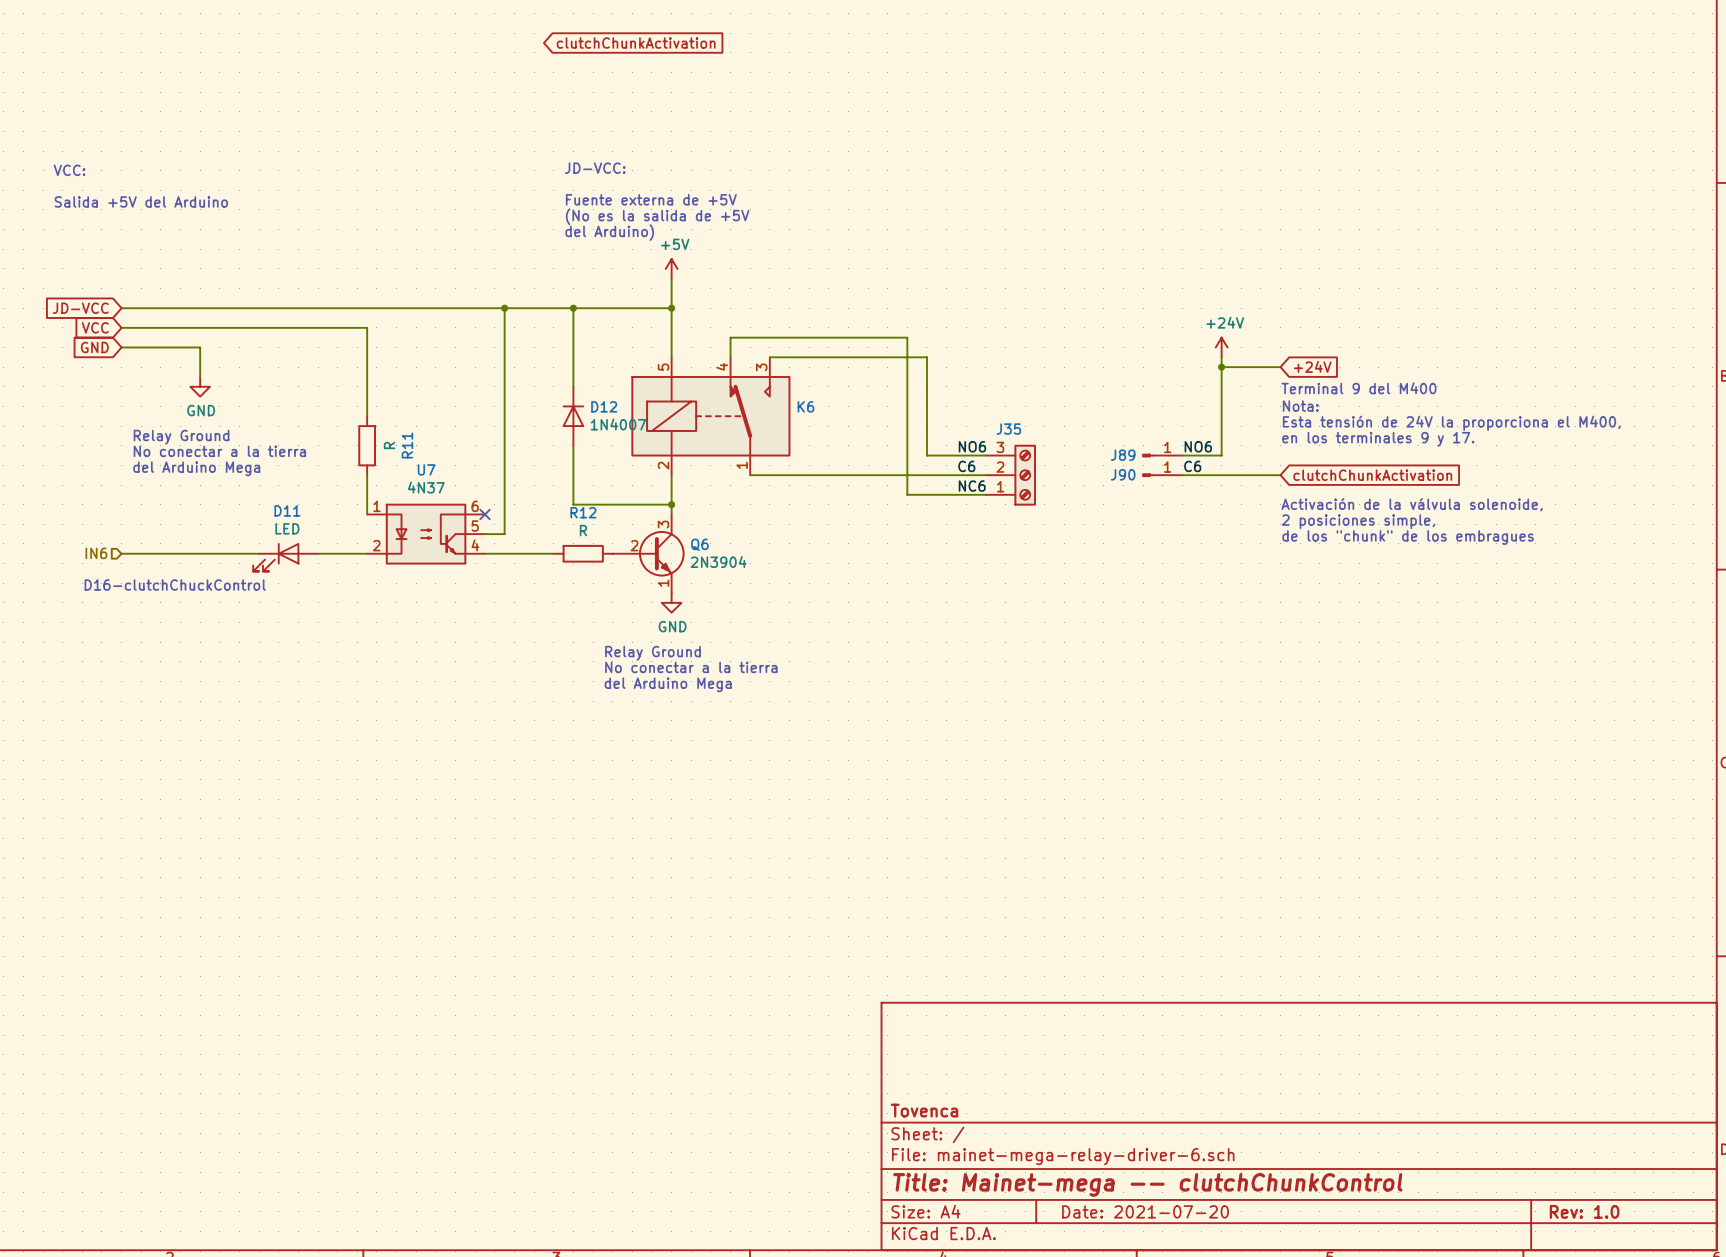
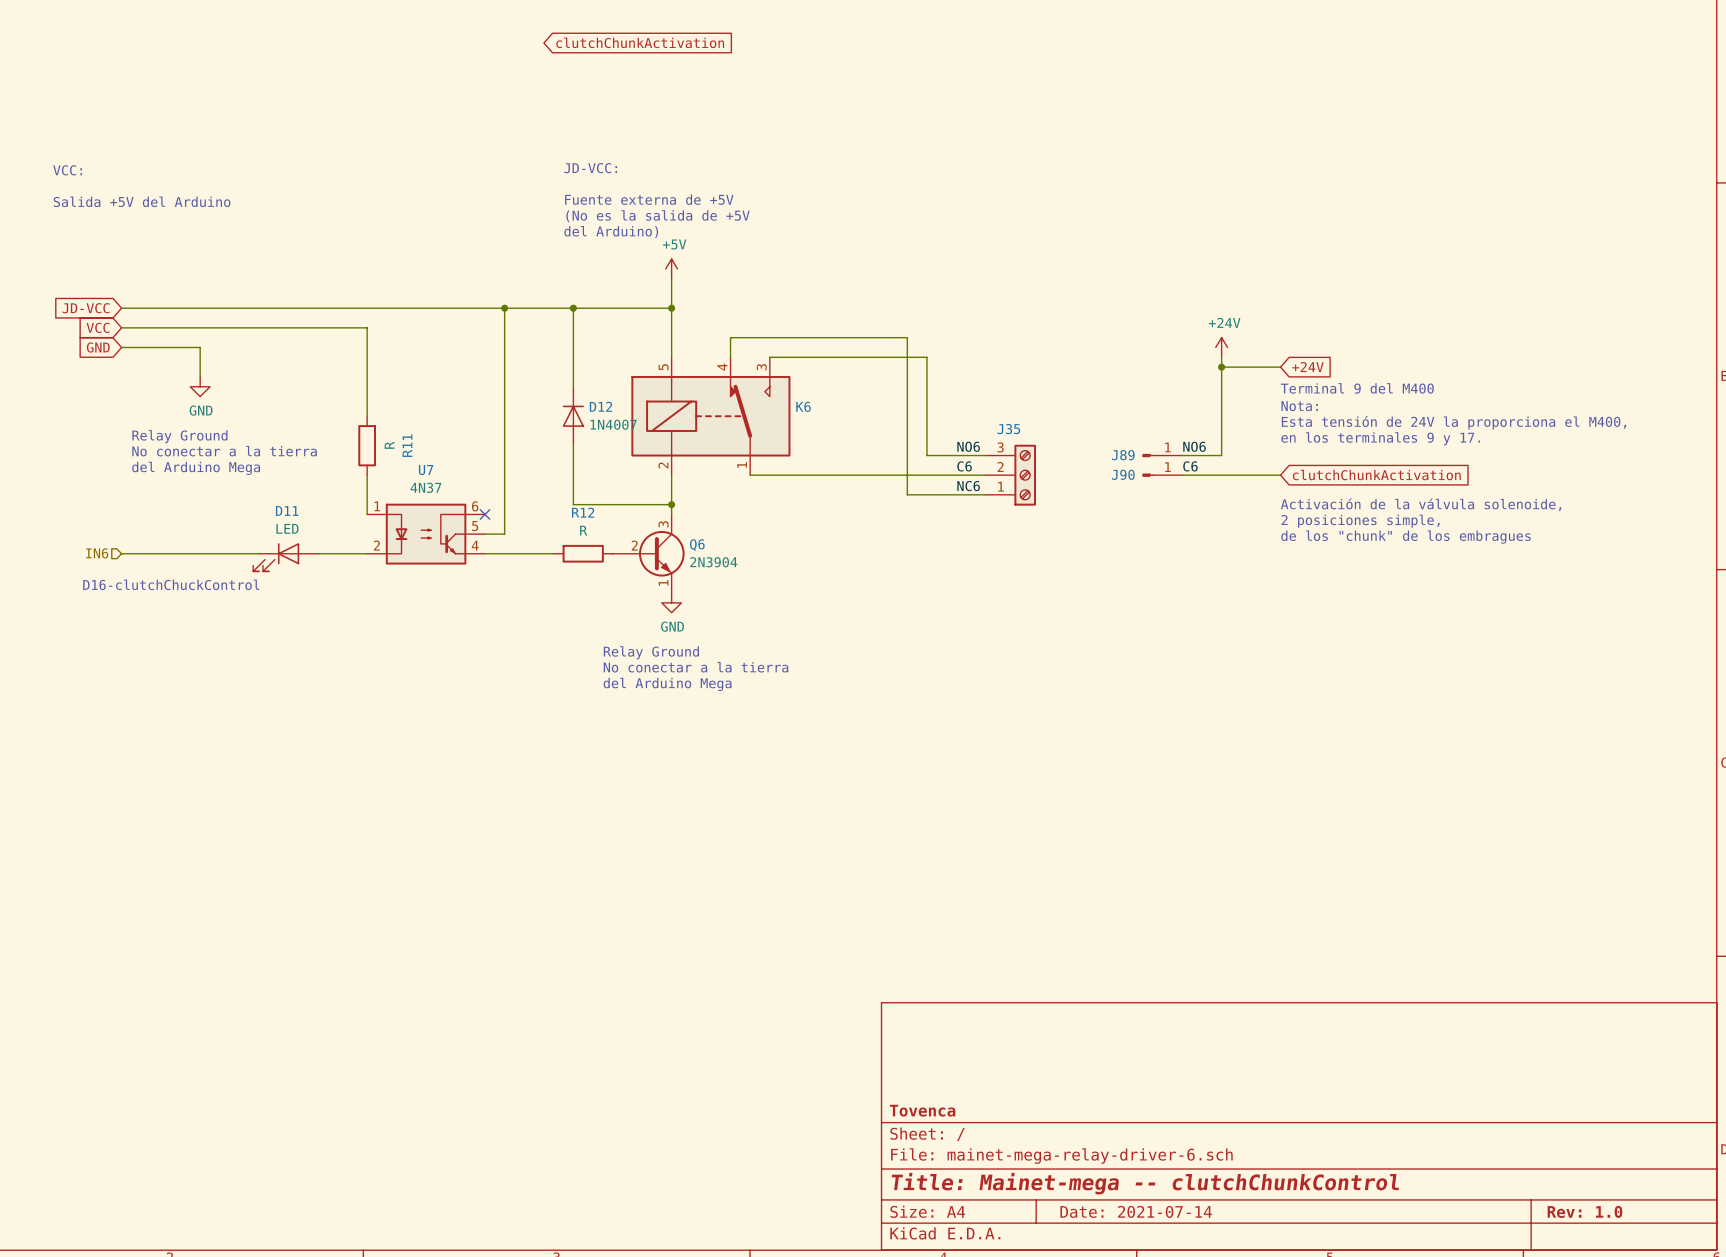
title block: Date: 2021-07-20 (1145, 1211) -> Date: 2021-07-14 (1136, 1211)

